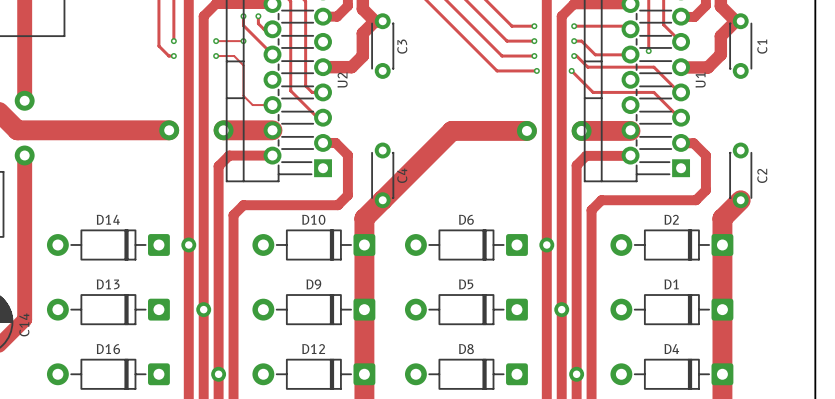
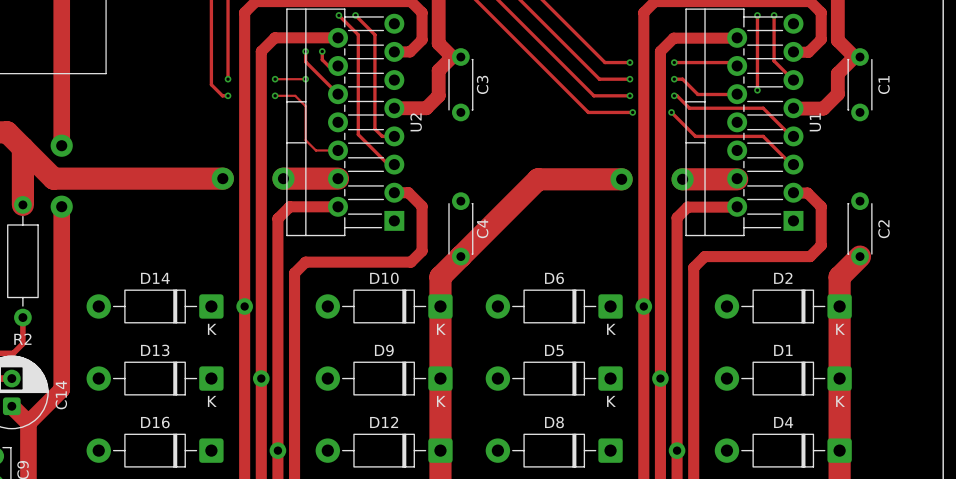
D14 text: none -> K (212, 329)
D10 text: none -> K (441, 329)
D6 text: none -> K (611, 329)
D2 text: none -> K (840, 329)
D13 text: none -> K (212, 401)
D9 text: none -> K (441, 401)
D5 text: none -> K (611, 401)
D1 text: none -> K (840, 401)

